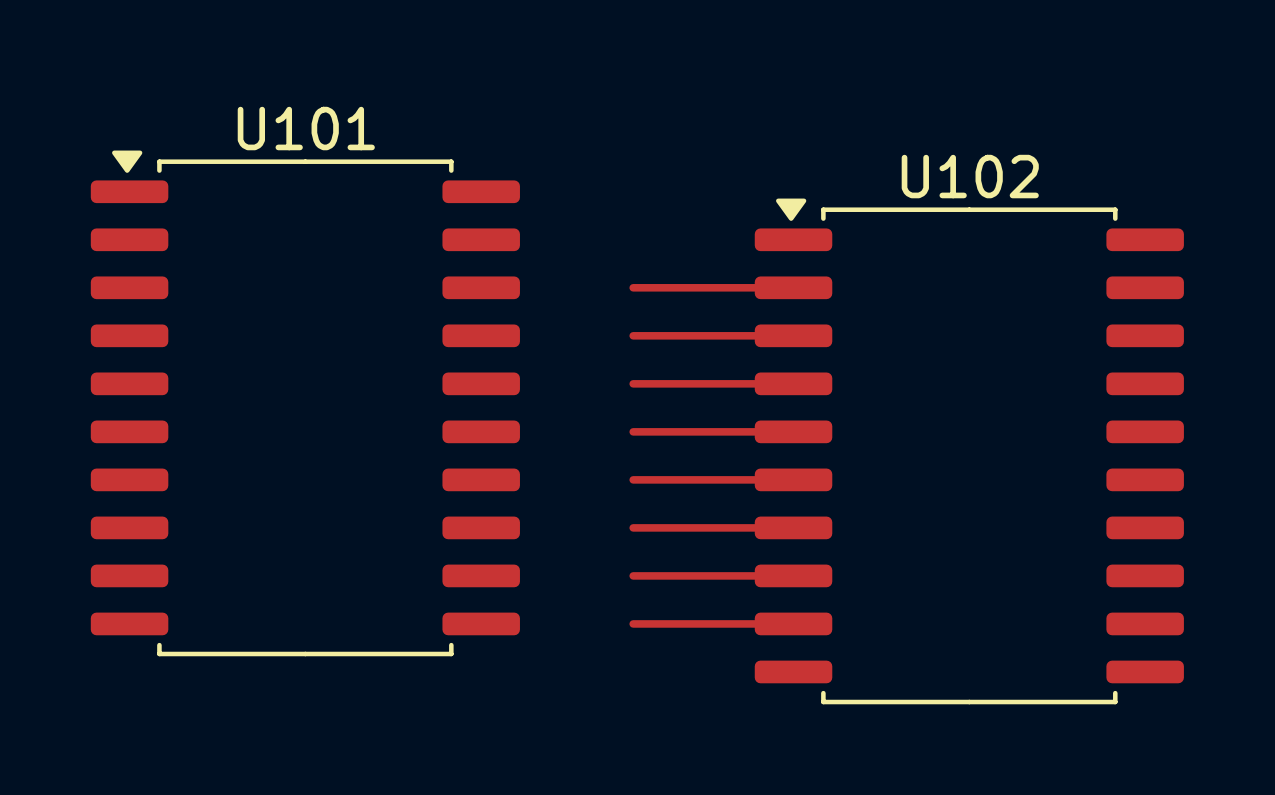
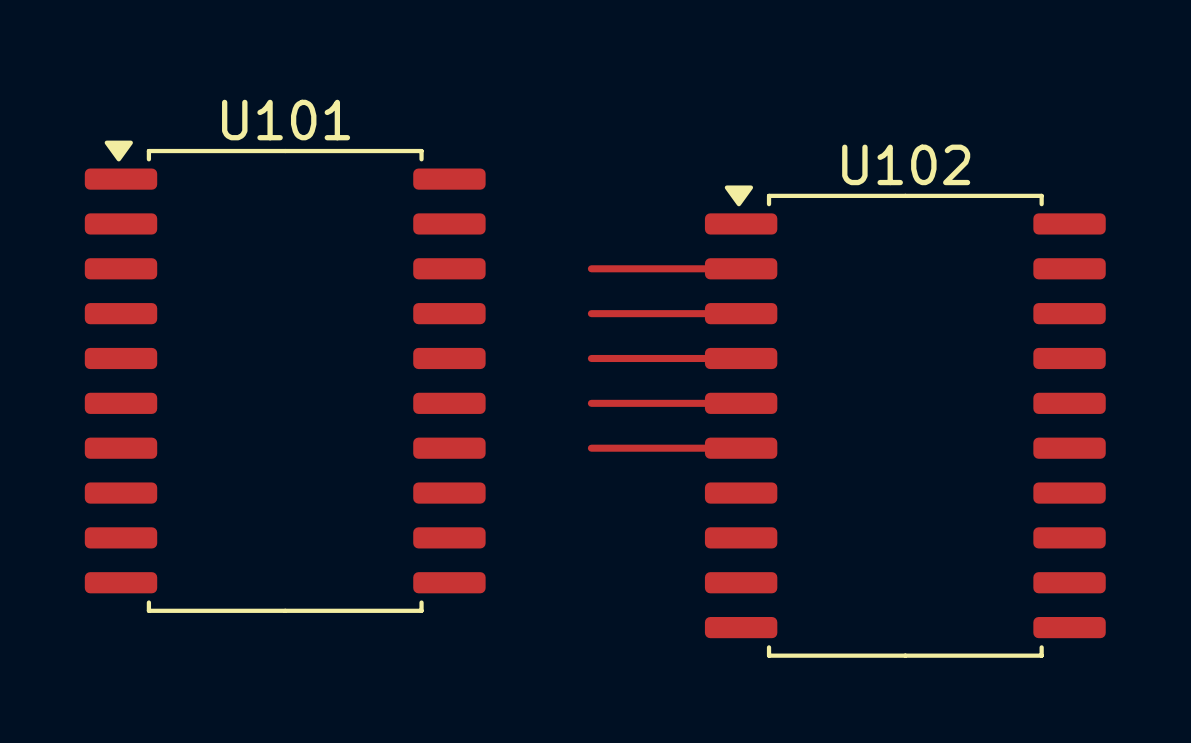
track: (633, 527) (793, 527) -> none
track: (633, 575) (793, 575) -> none
track: (633, 623) (793, 623) -> none

